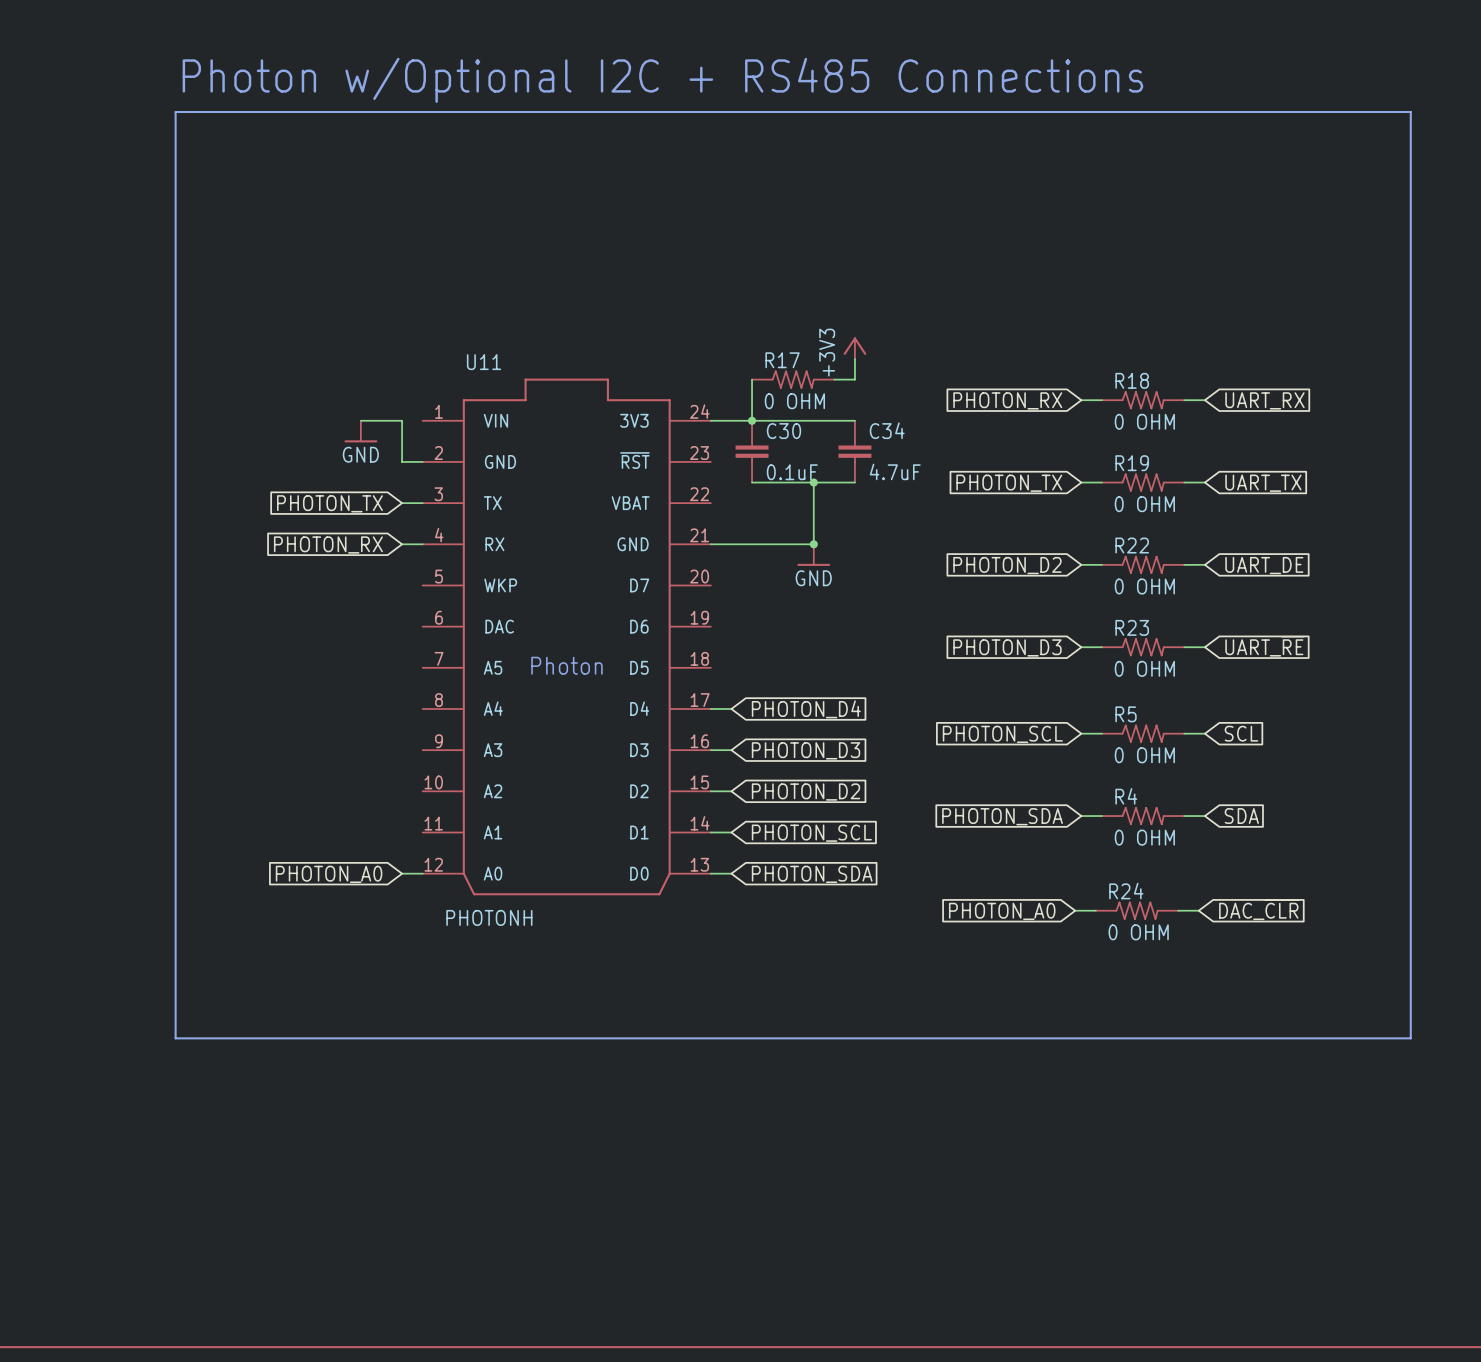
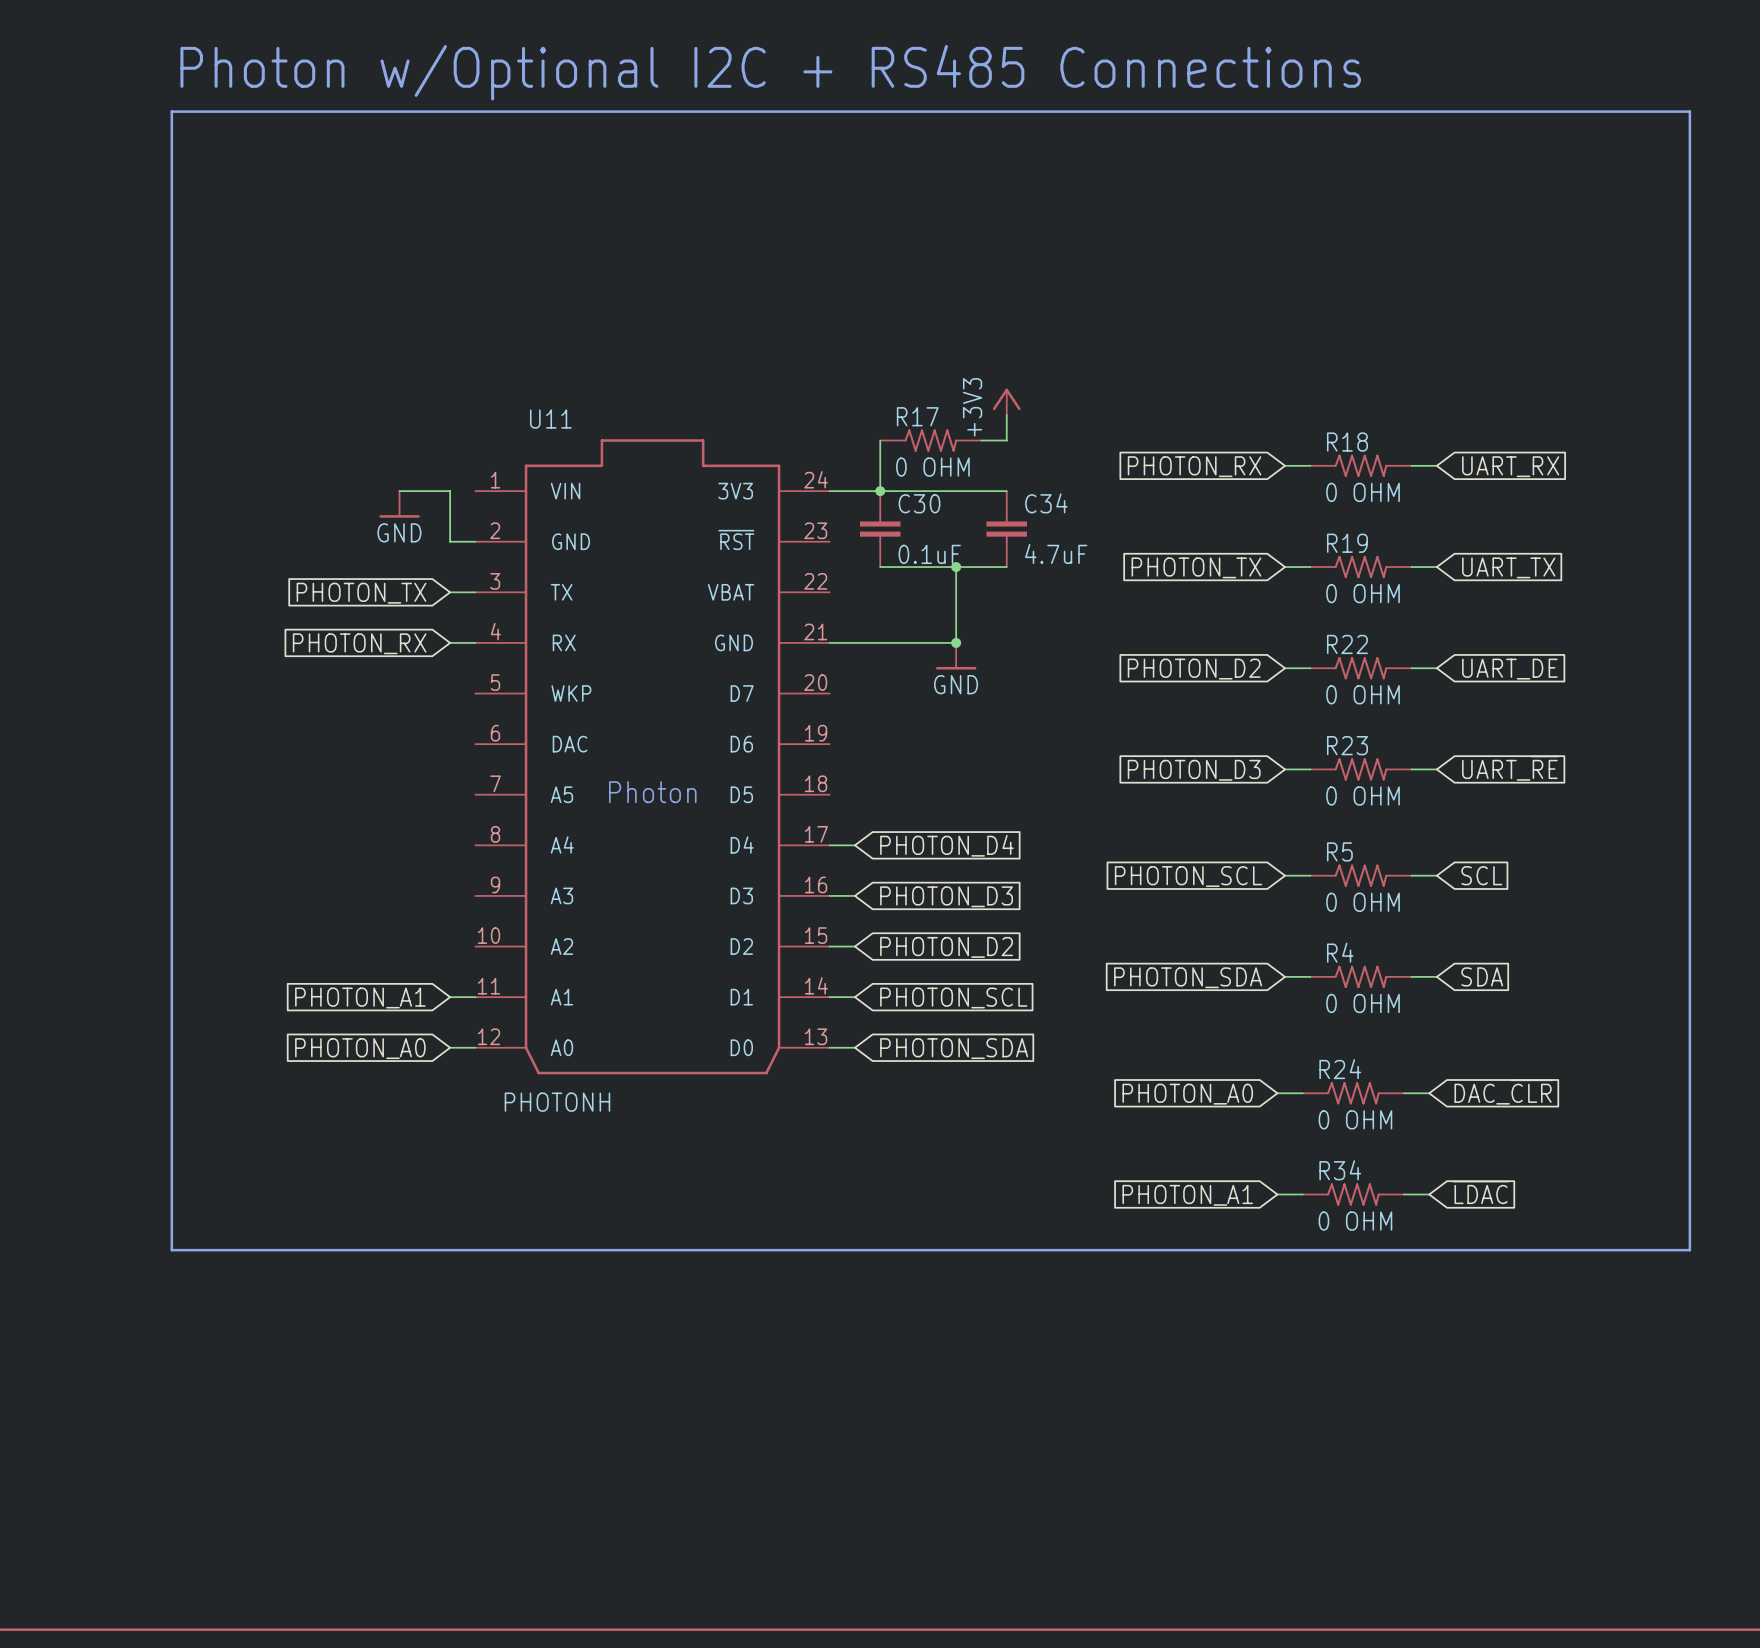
wire: none -> (450, 997) (475, 997)
global label: none -> PHOTON_A1 (360, 997)
global label: none -> ~{LDAC} (1480, 1192)
global label: none -> PHOTON_A1 (1187, 1195)
wire: none -> (1277, 1194) (1302, 1194)
R34: none -> 0 OHM (1353, 1194)
wire: none -> (1403, 1194) (1429, 1194)

